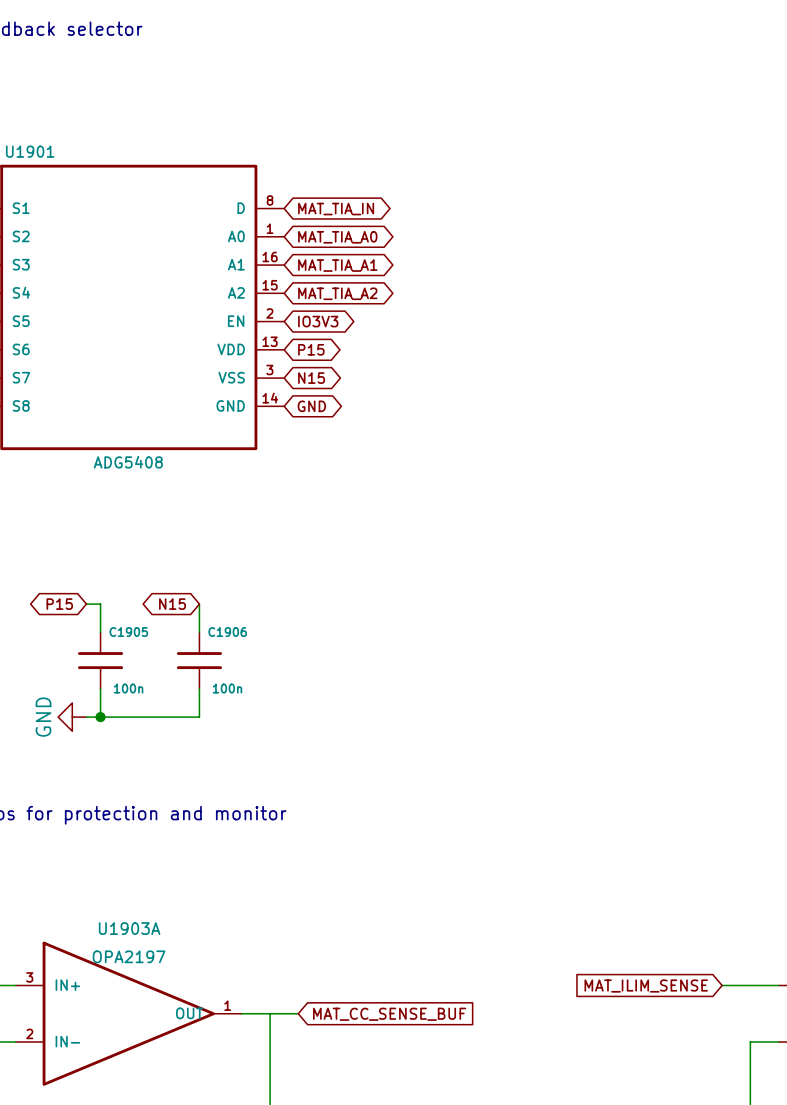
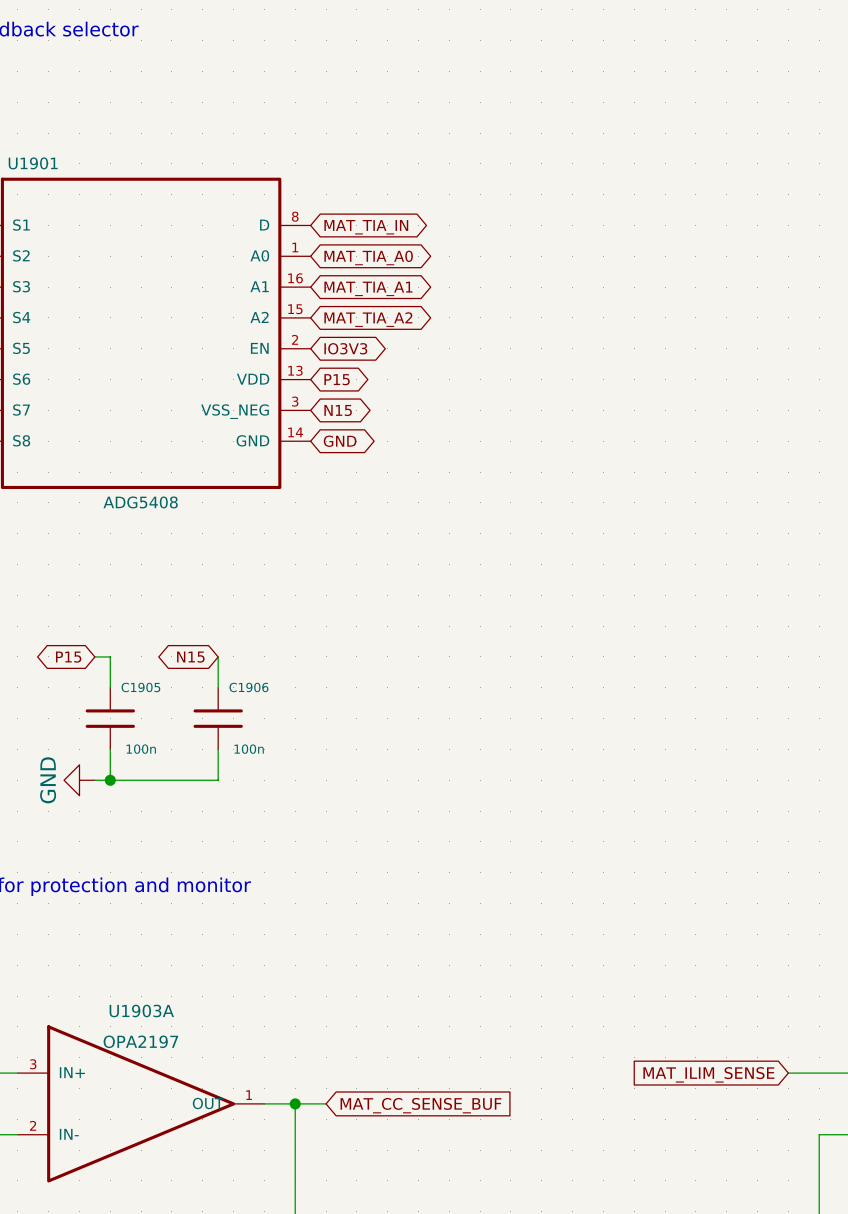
U1901 pin name: VSS (231, 377) -> VSS_NEG (235, 411)
junction: none -> (295, 1103)

